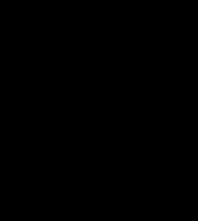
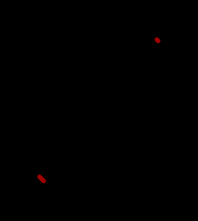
track: none -> (156, 39) (158, 40)
track: none -> (39, 176) (43, 181)

